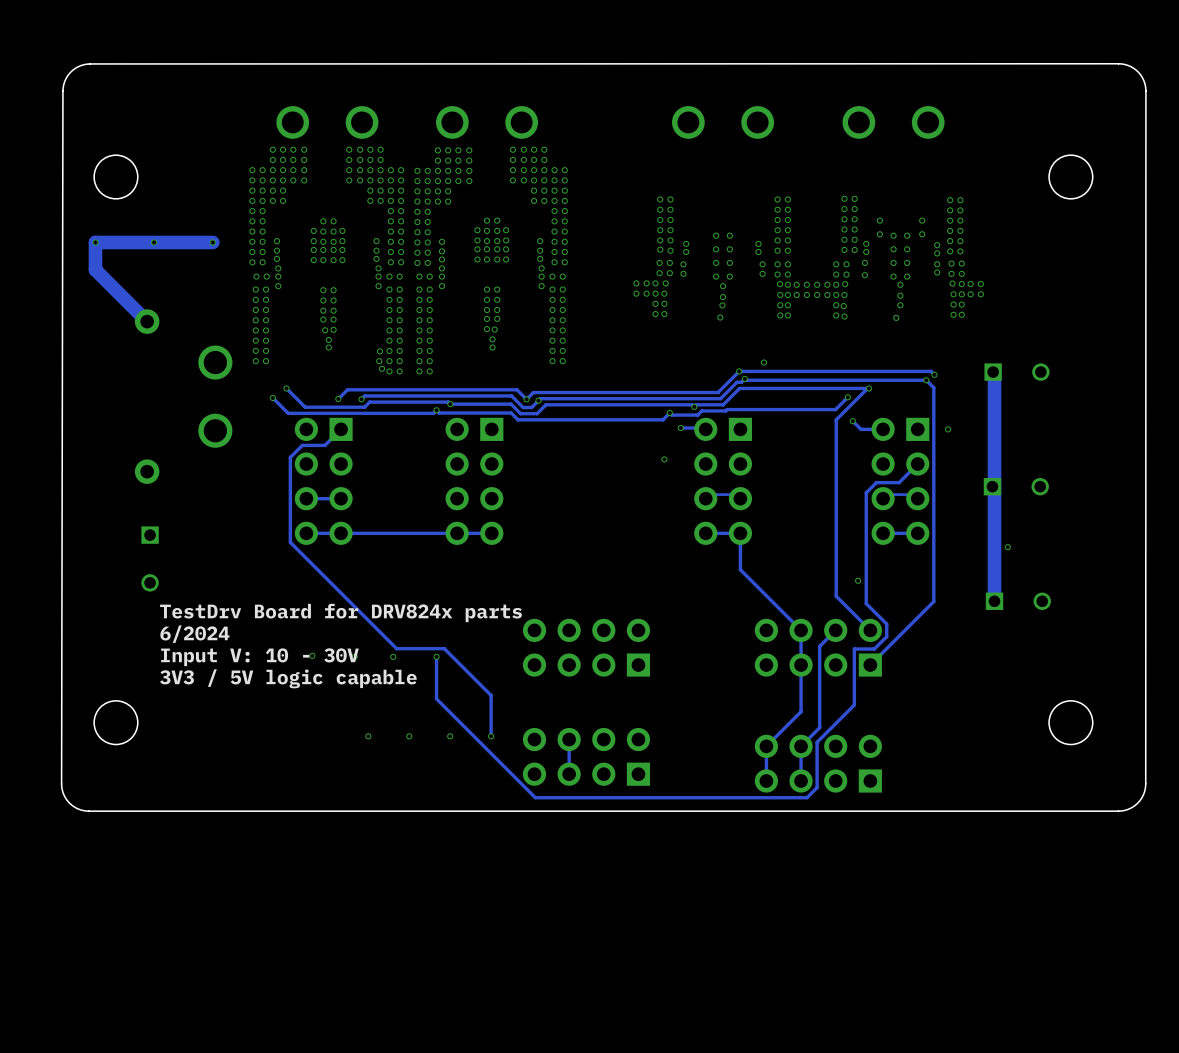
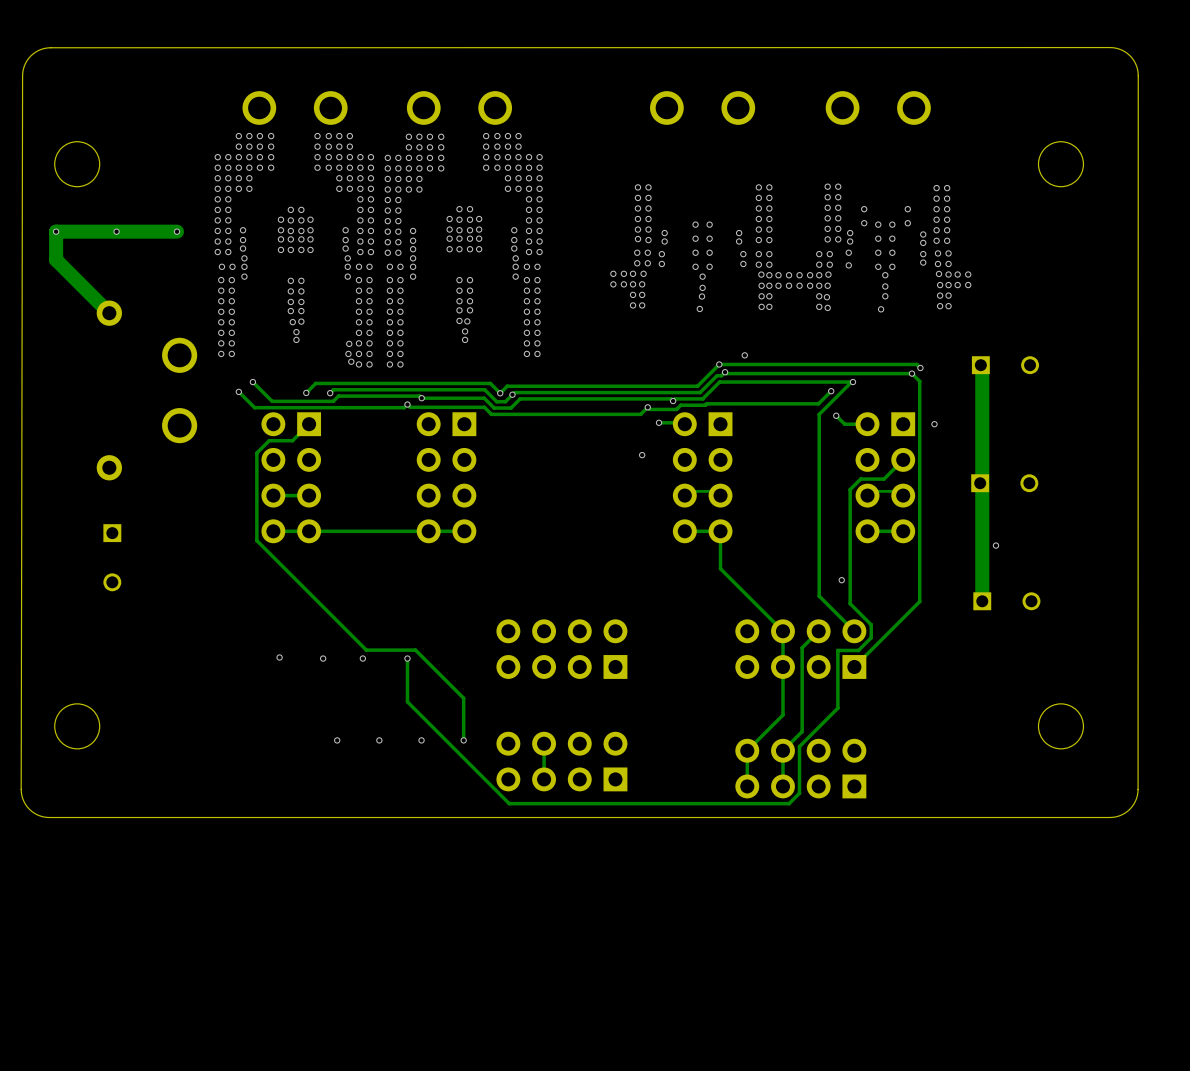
text: TestDrv Board for DRV824x parts (340, 613) -> none
text: 6/2024 (194, 634) -> none
text: Input V: 10 - 30V (259, 657) -> none
text: 3V3 / 5V logic capable (288, 678) -> none

